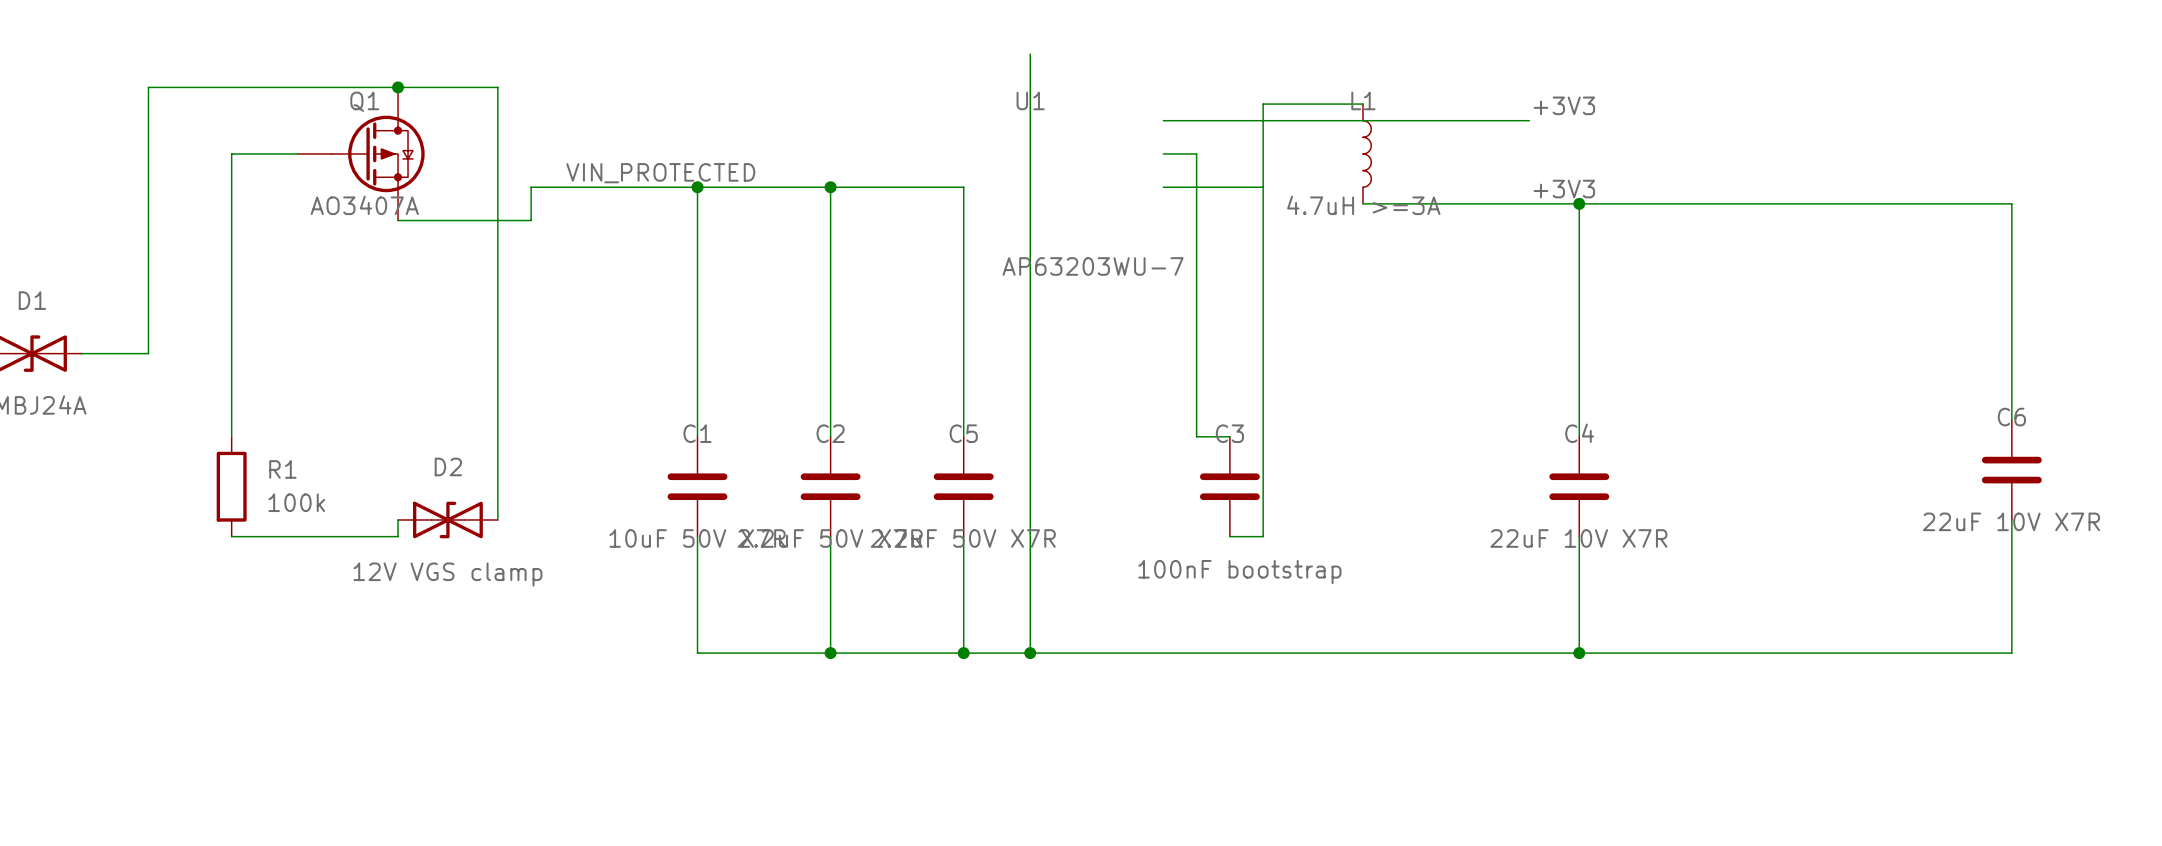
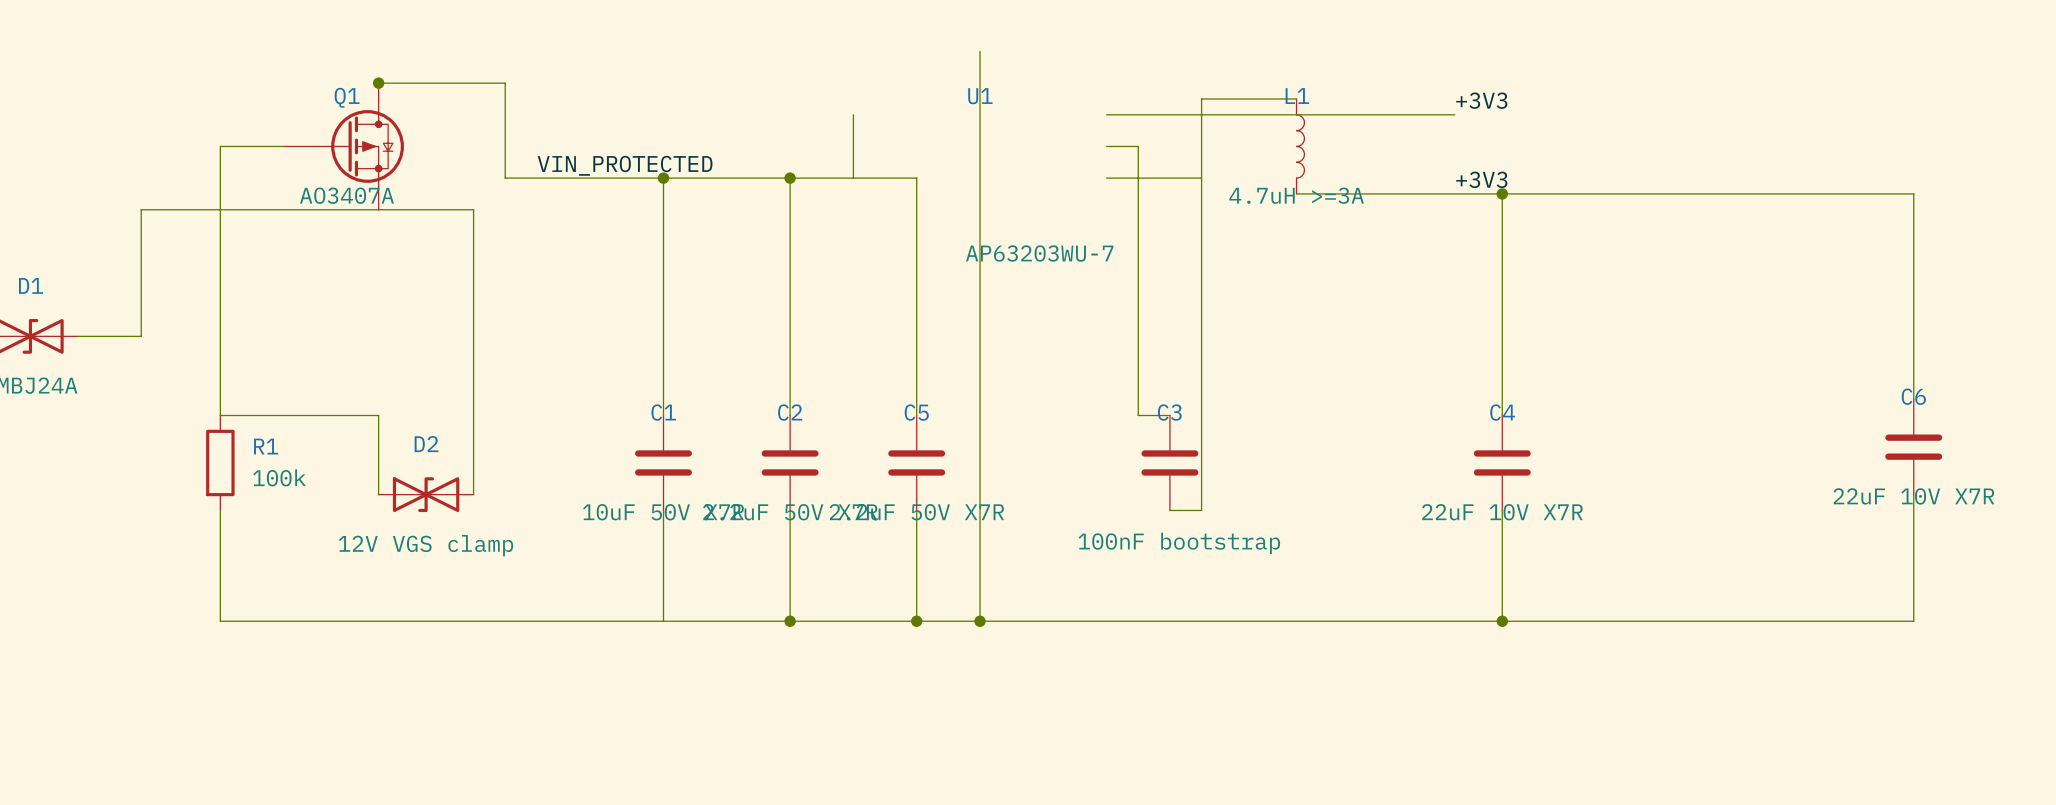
wire: (398, 87) (148, 87) (148, 220) -> (378, 209) (141, 209)
wire: (497, 87) (497, 220) (531, 220) (531, 187) -> (473, 83) (505, 83) (505, 178)
wire: none -> (853, 114) (853, 178)
wire: (398, 519) (398, 536) (231, 536) -> (378, 494) (378, 415) (220, 415)
wire: none -> (220, 510) (220, 621) (663, 621)

